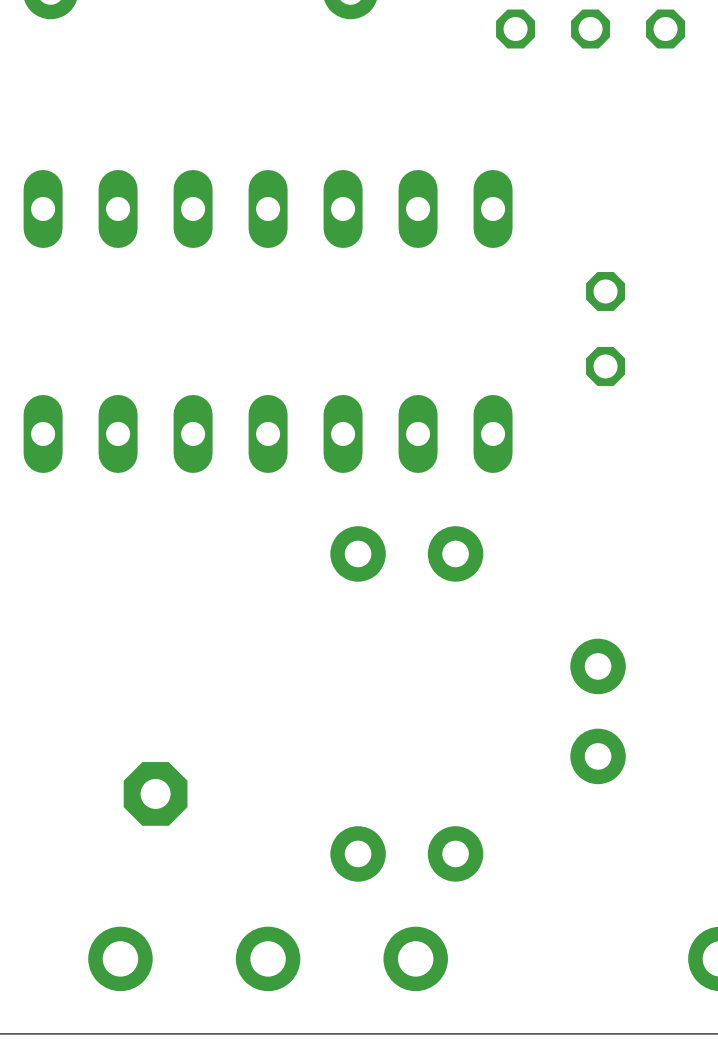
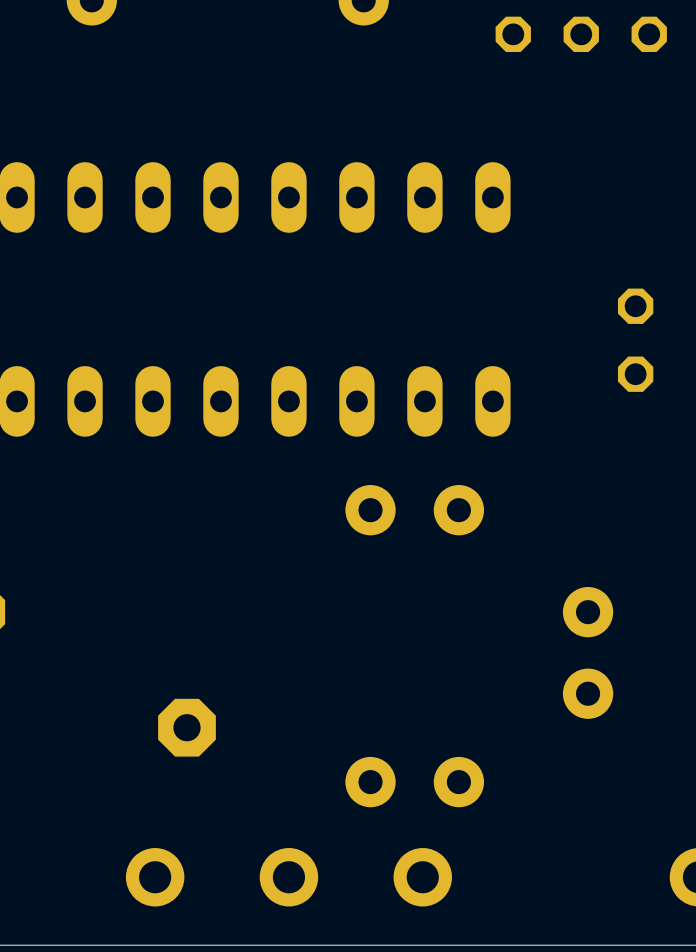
part position: (605, 328) -> (635, 340)

